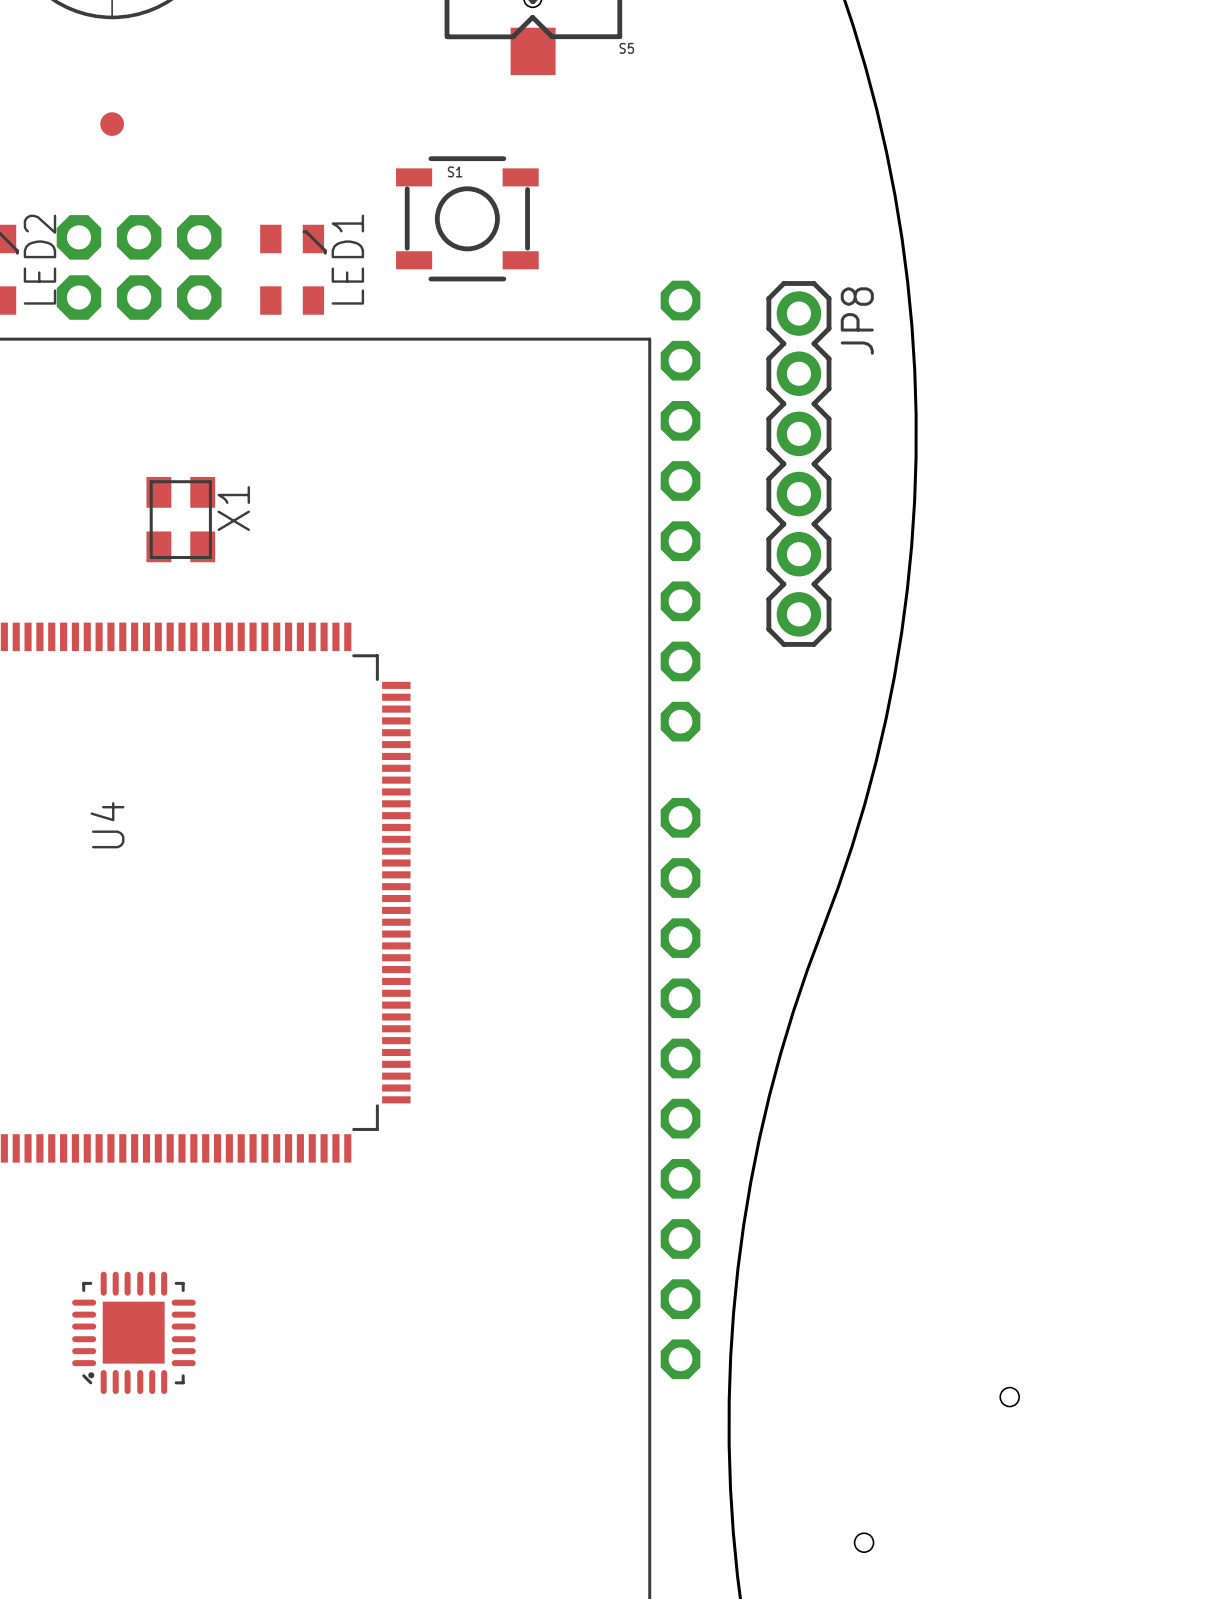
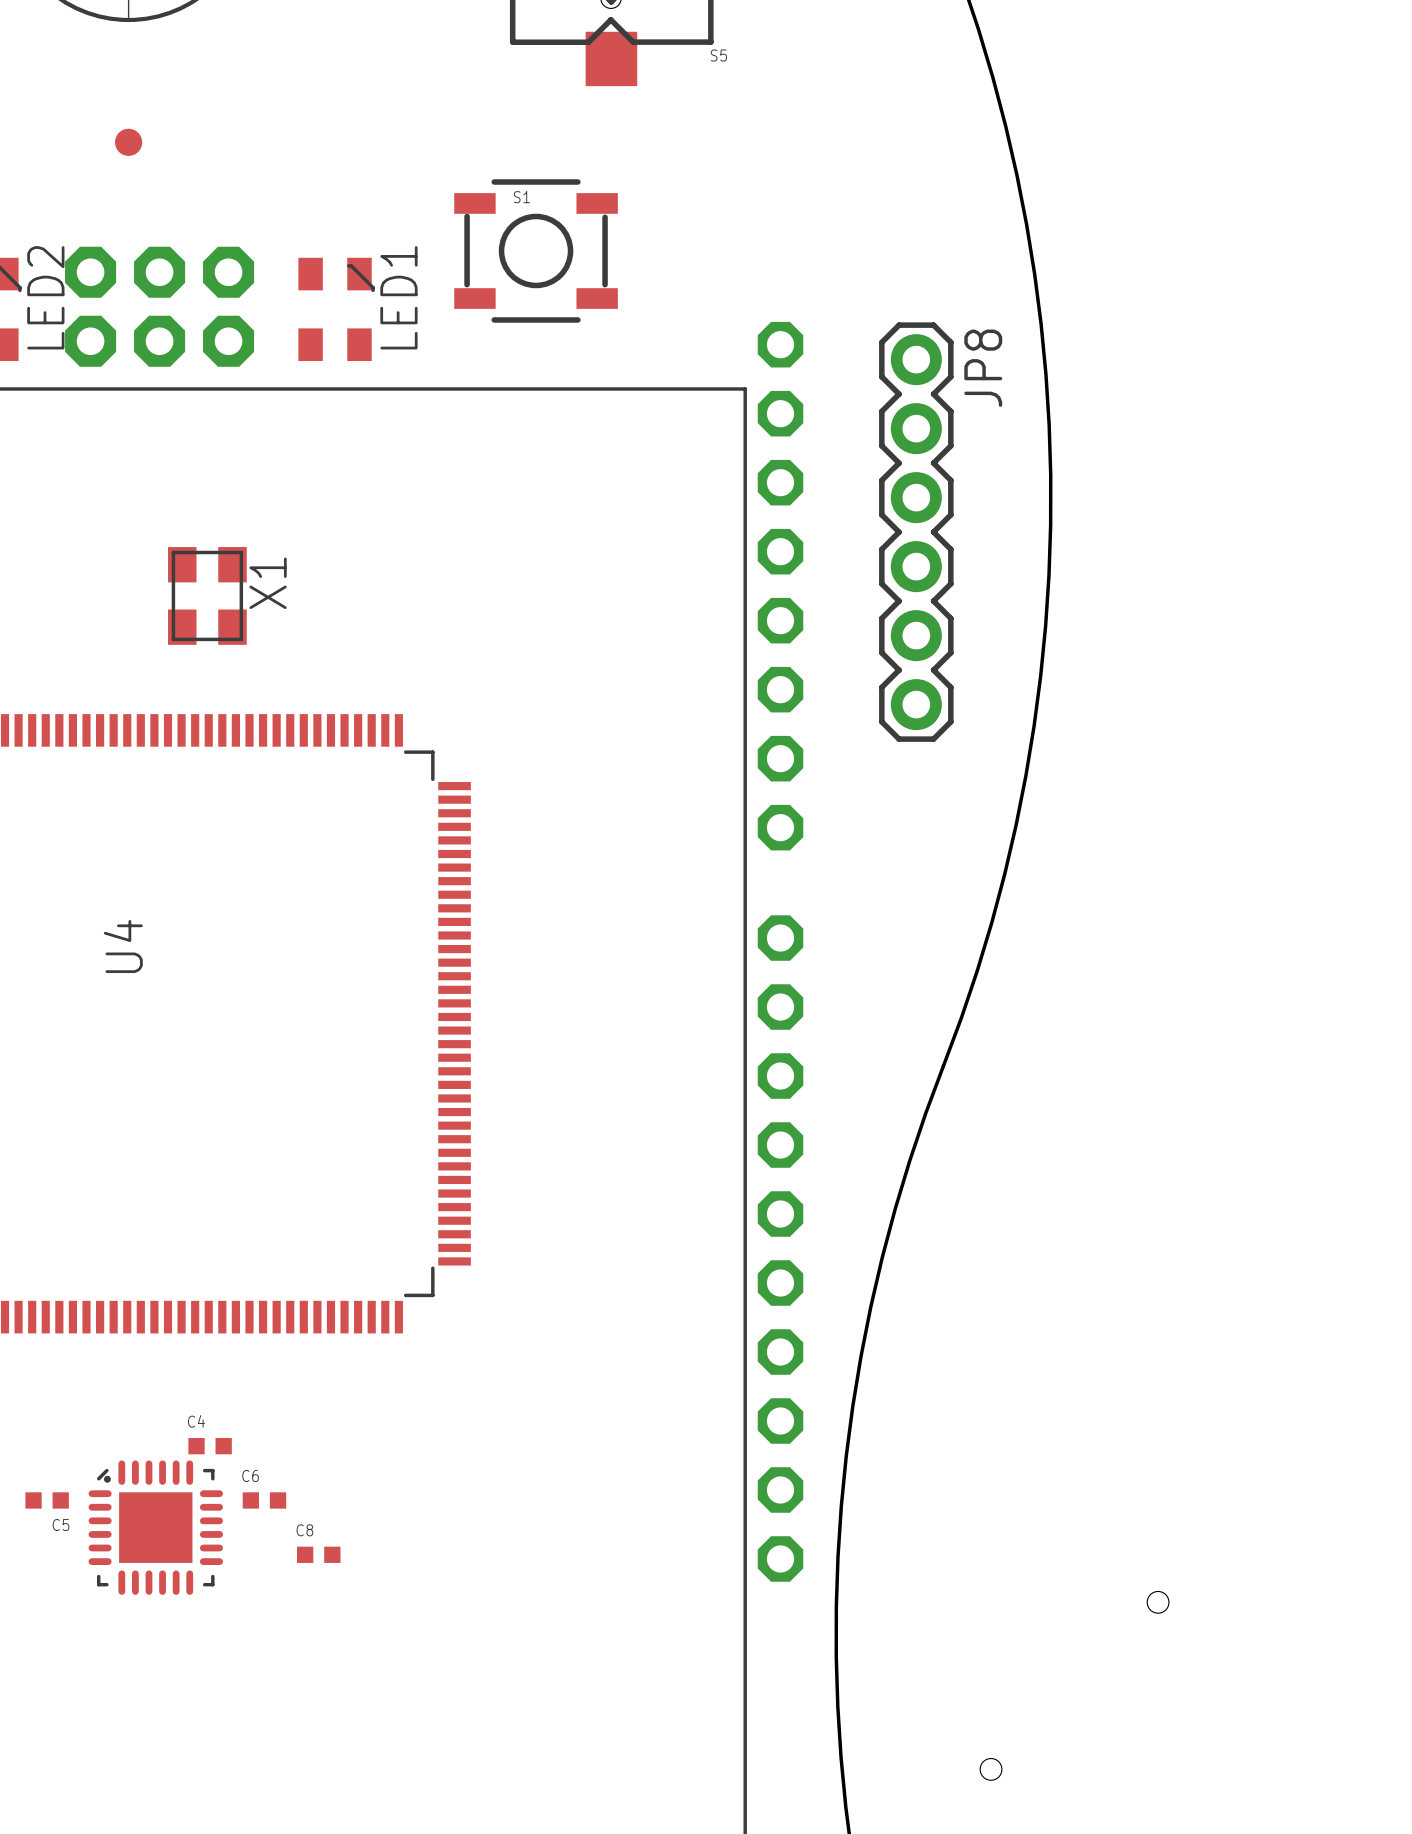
C4: none -> (210, 1446)
part footprint: [72, 1271, 196, 1395] -> [88, 1460, 224, 1595]
C5: none -> (47, 1500)
C6: none -> (264, 1500)
C8: none -> (318, 1554)

